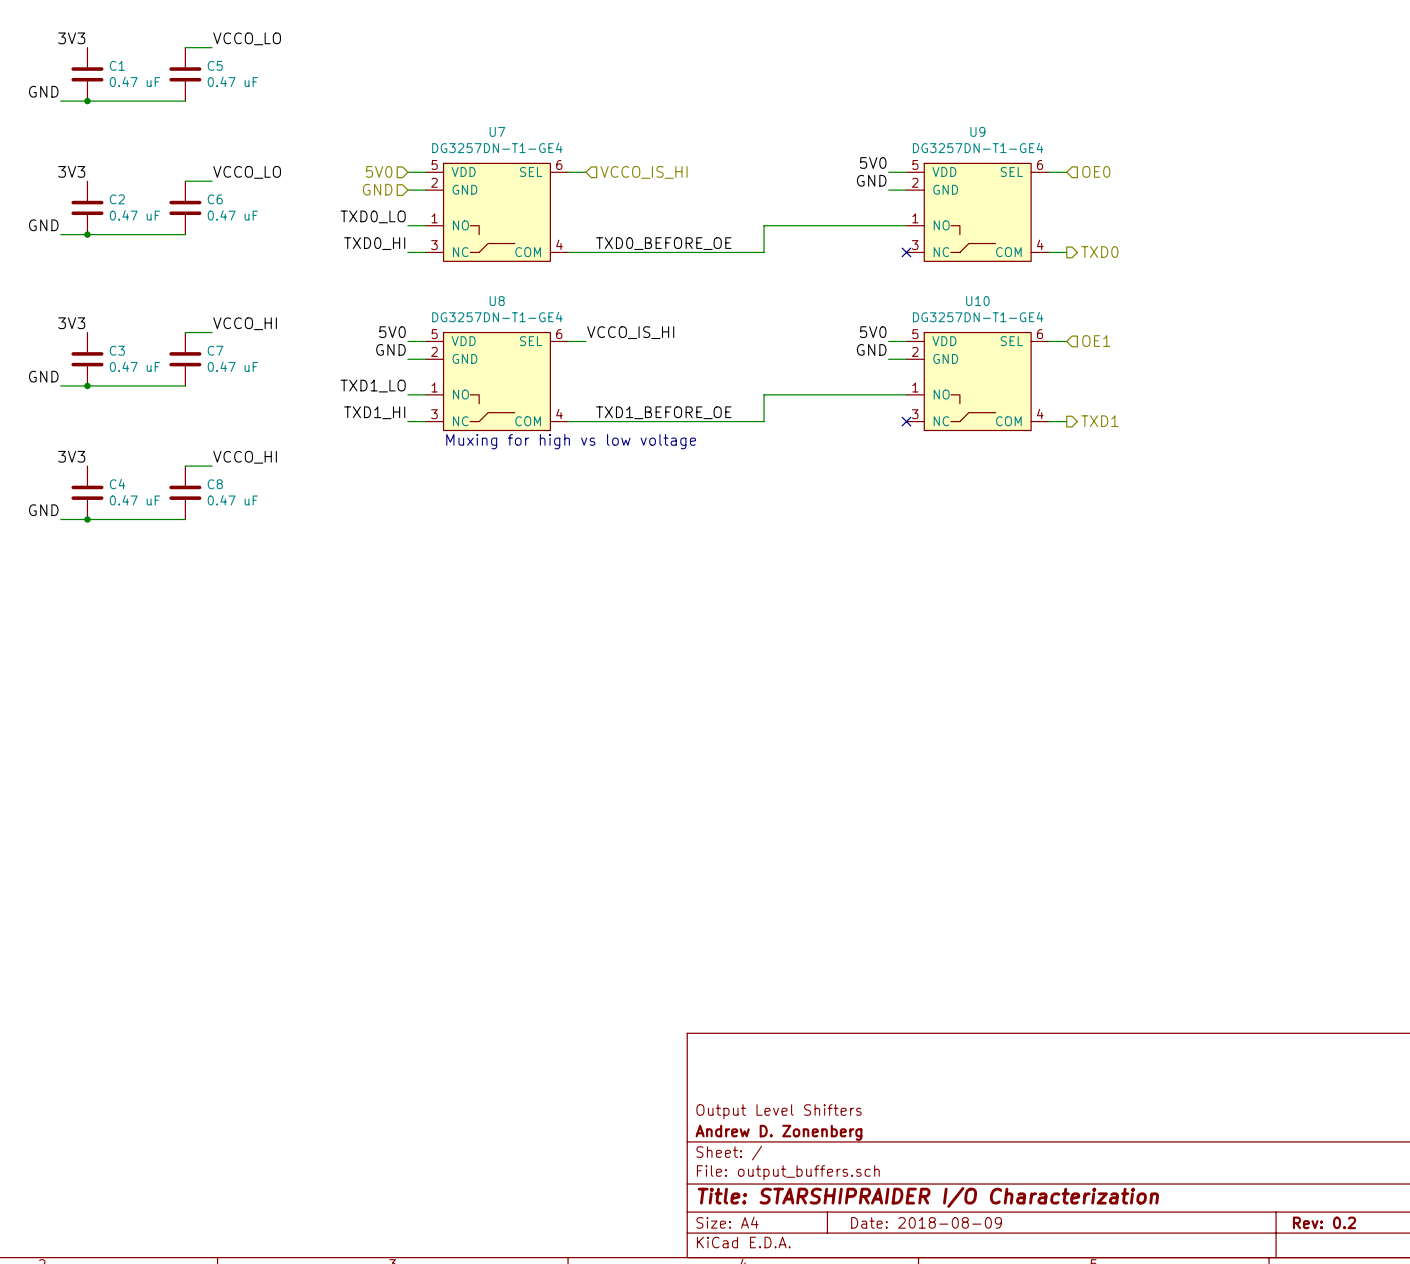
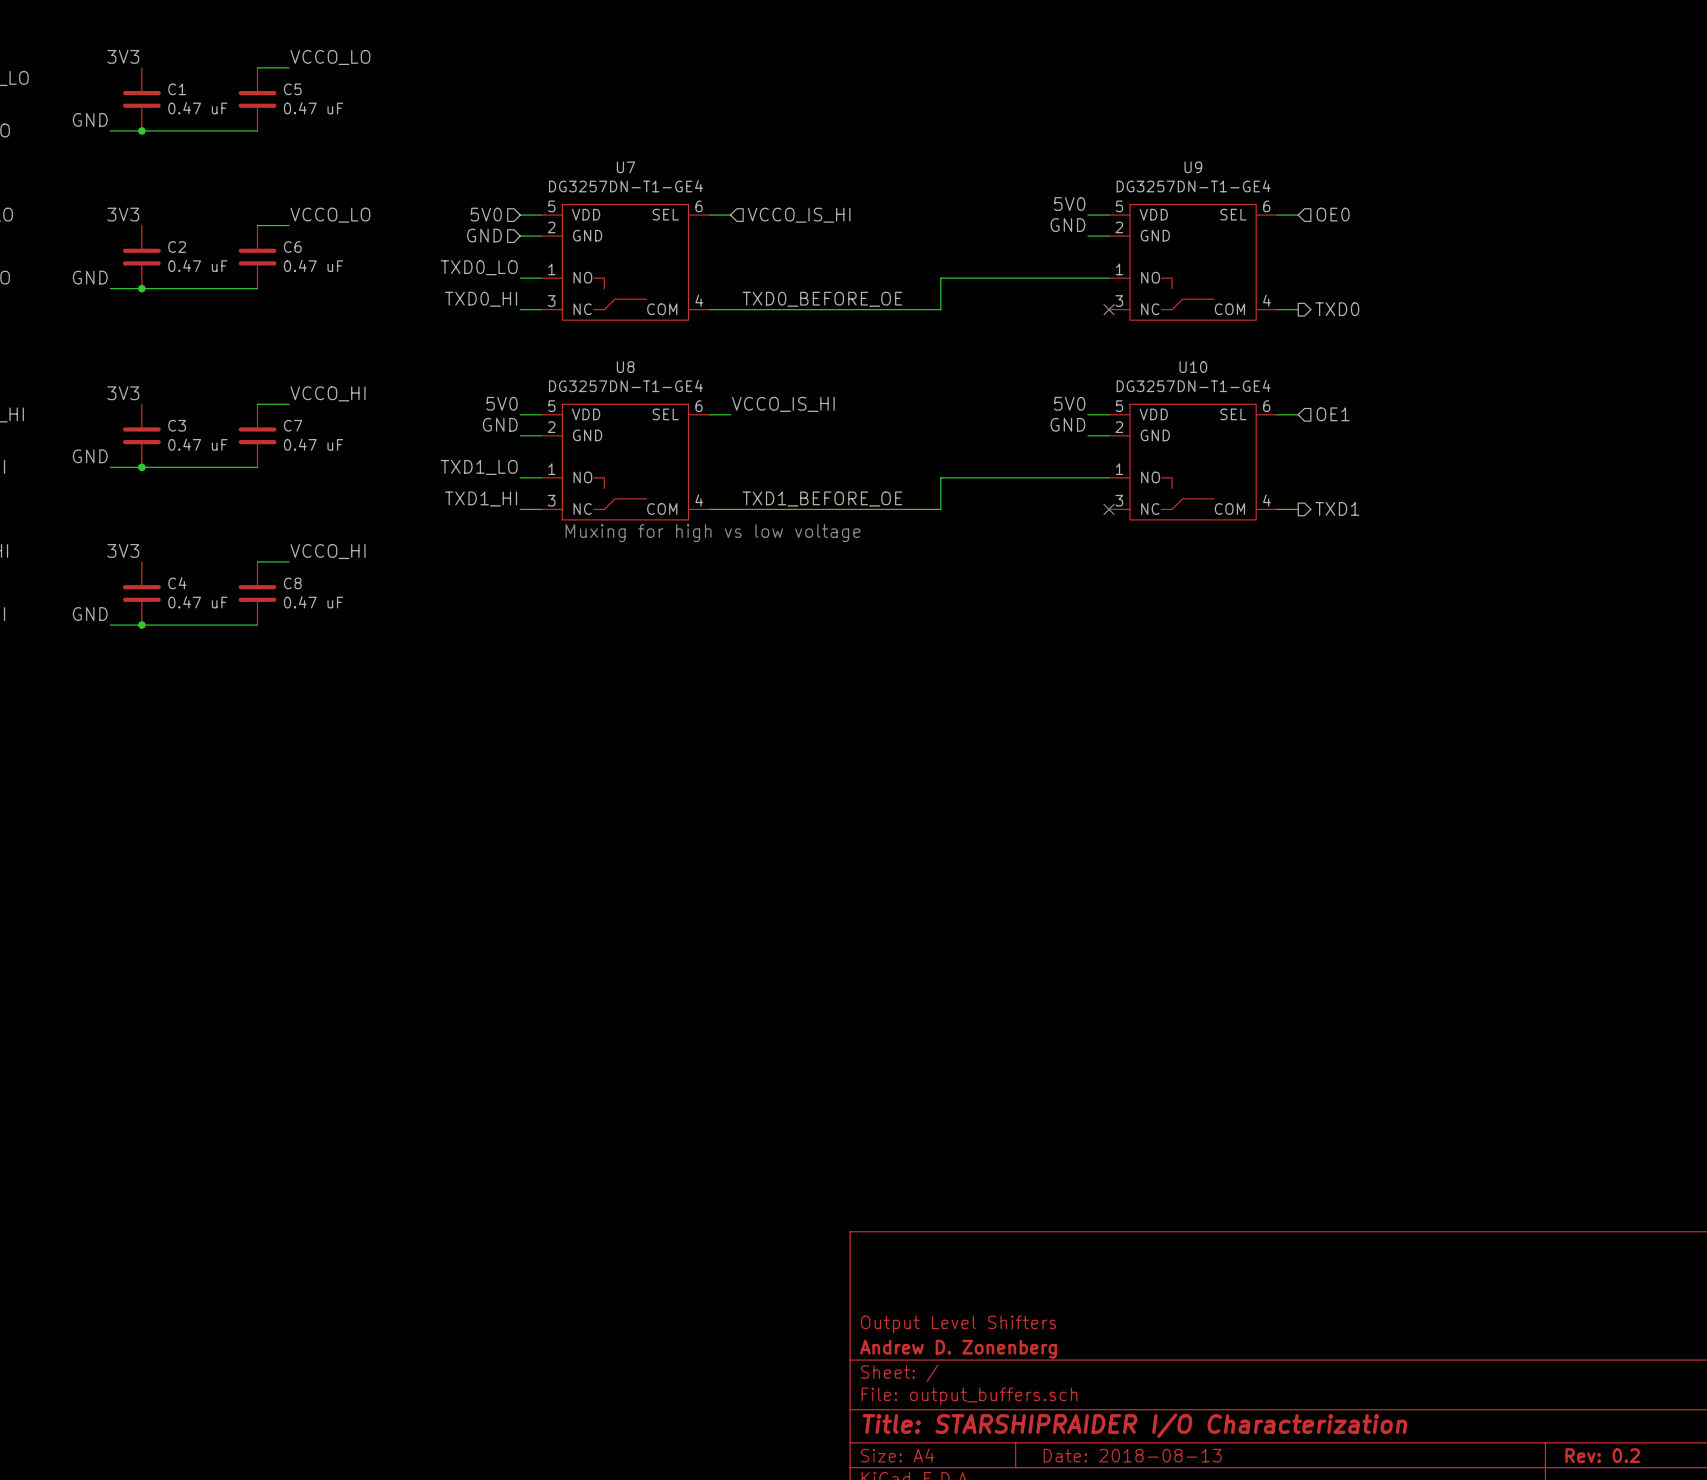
title block: Date: 2018-08-09 (926, 1222) -> Date: 2018-08-13 (1132, 1455)

